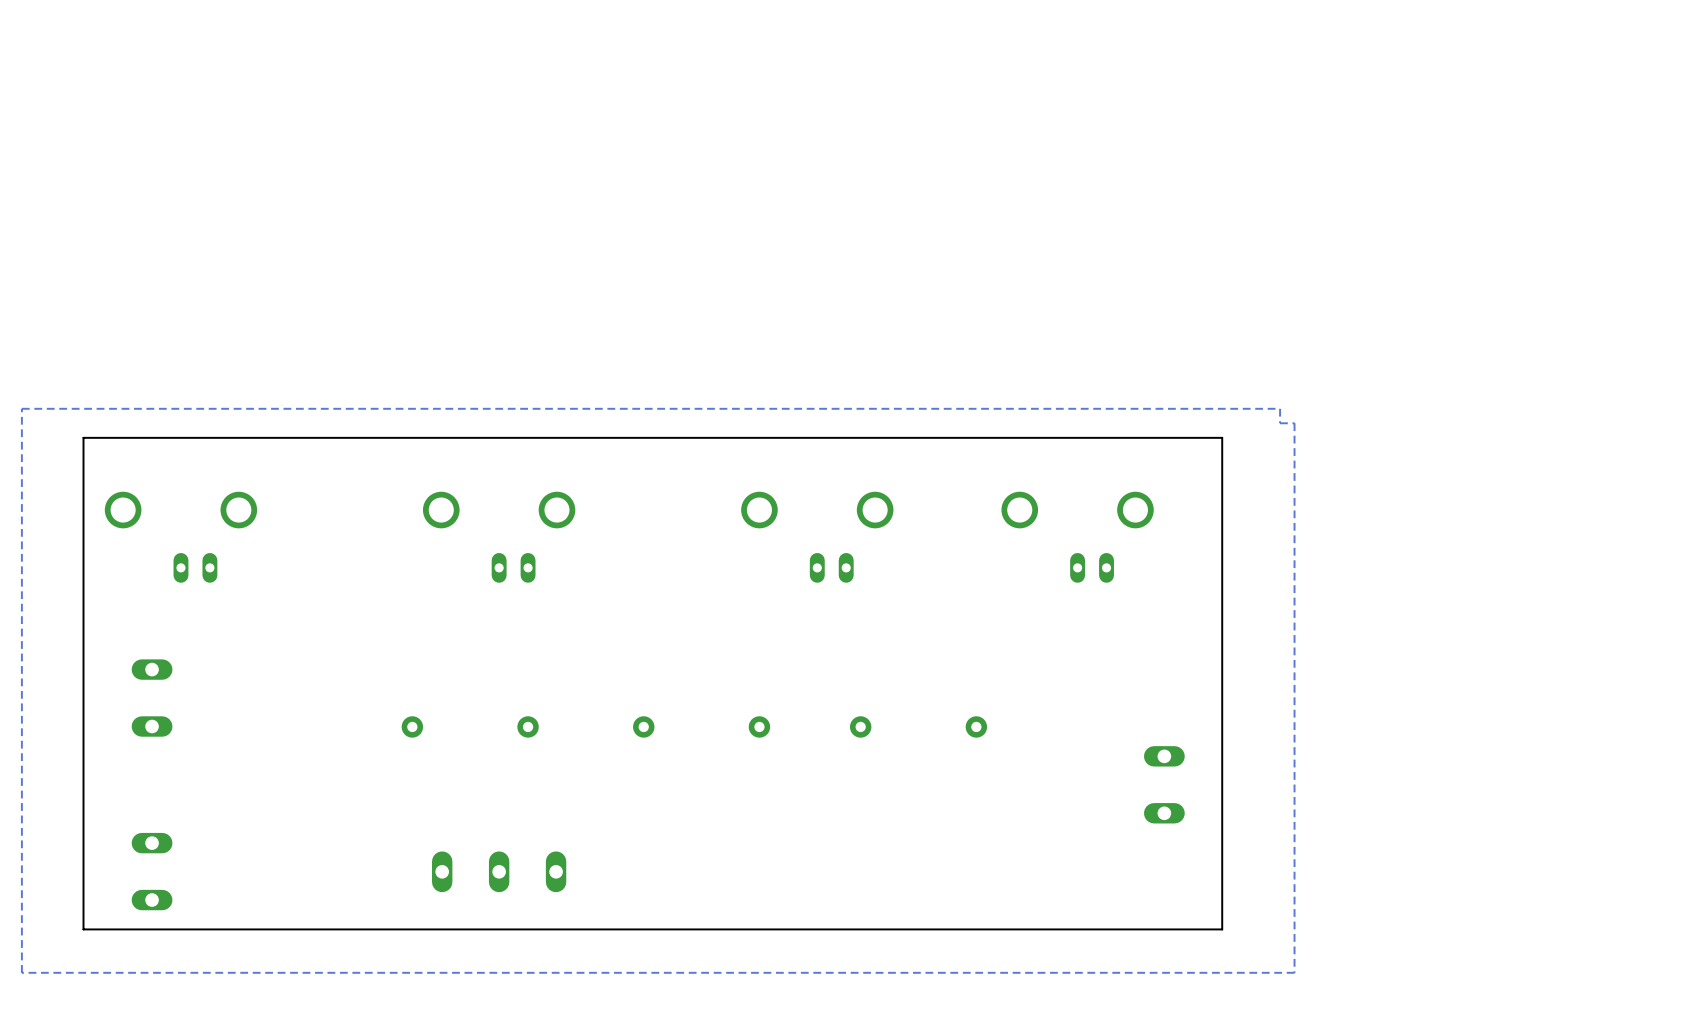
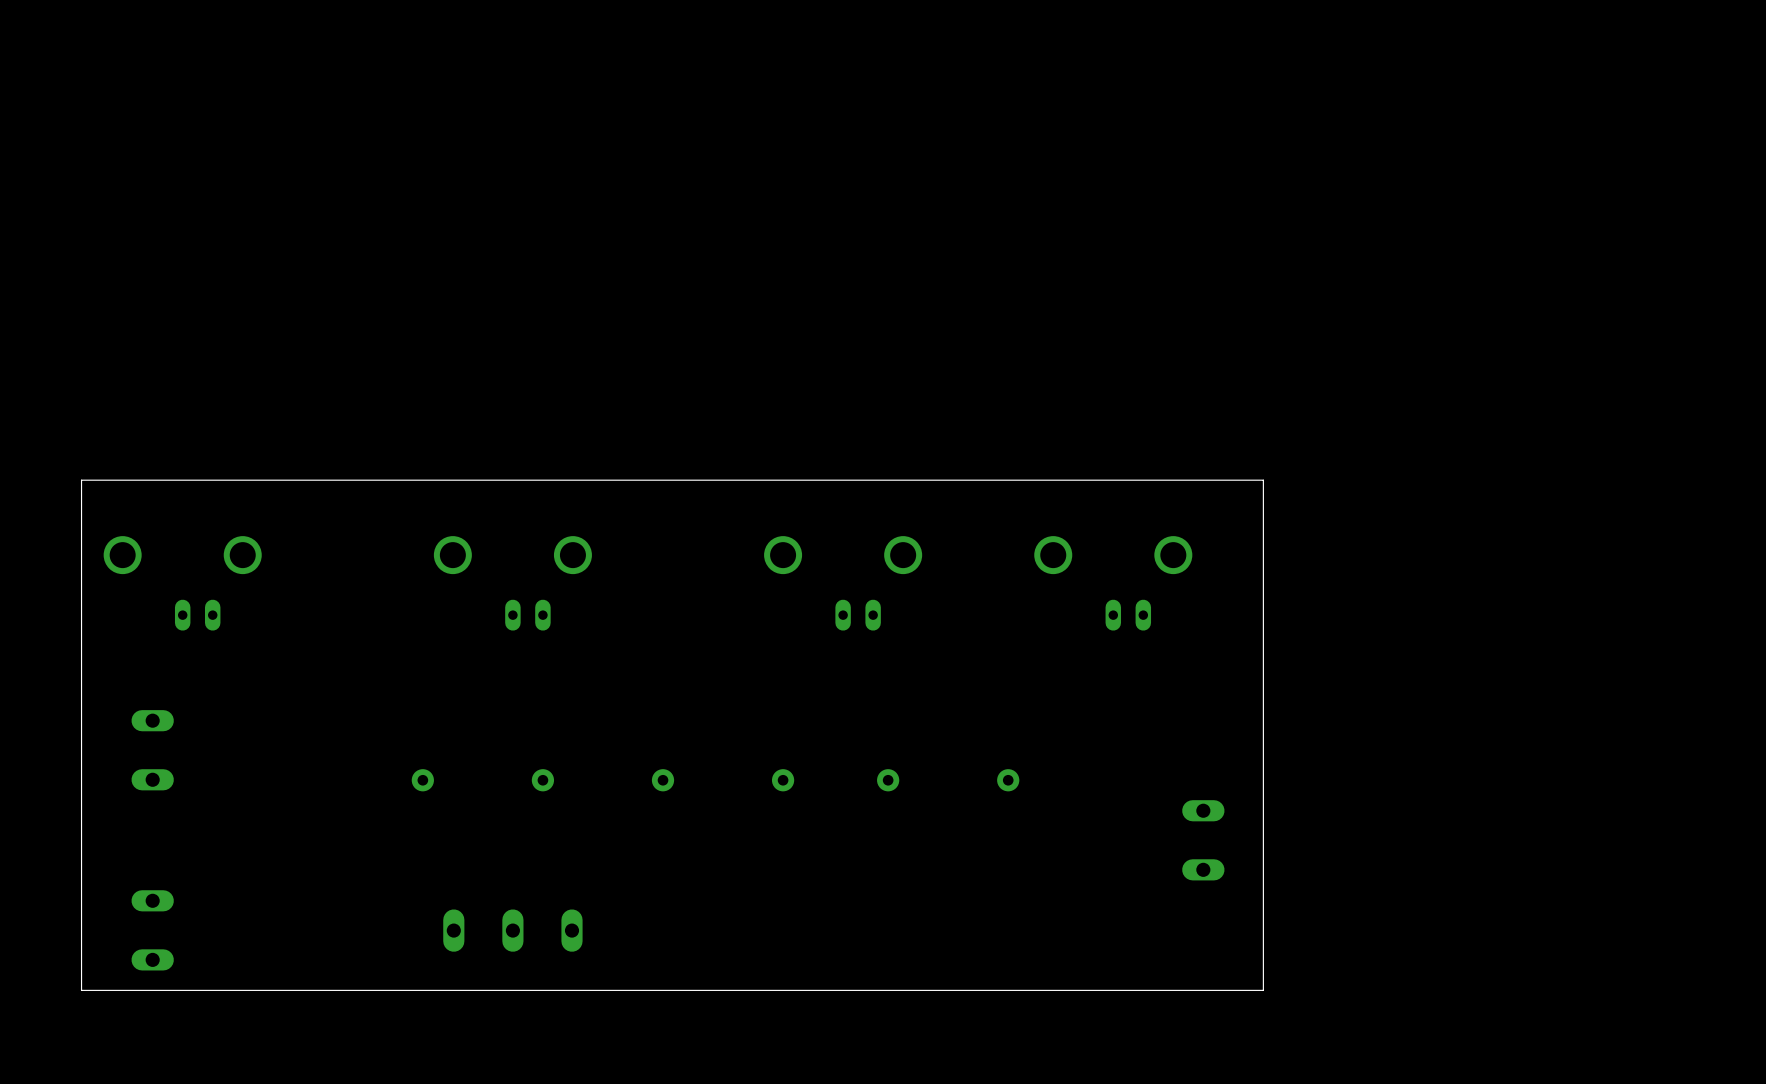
zone outline: (1280, 408) (21, 408) (21, 972) (1294, 972) (1294, 423) (1280, 423) (1280, 408) -> none

